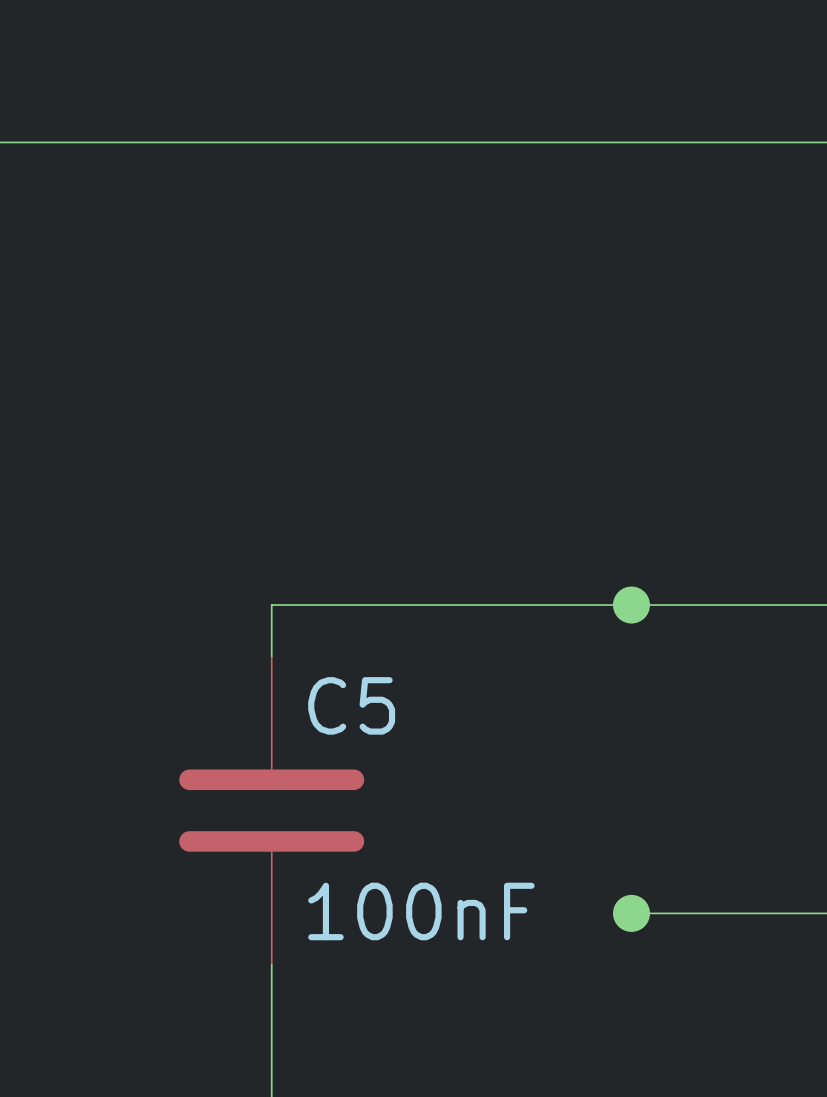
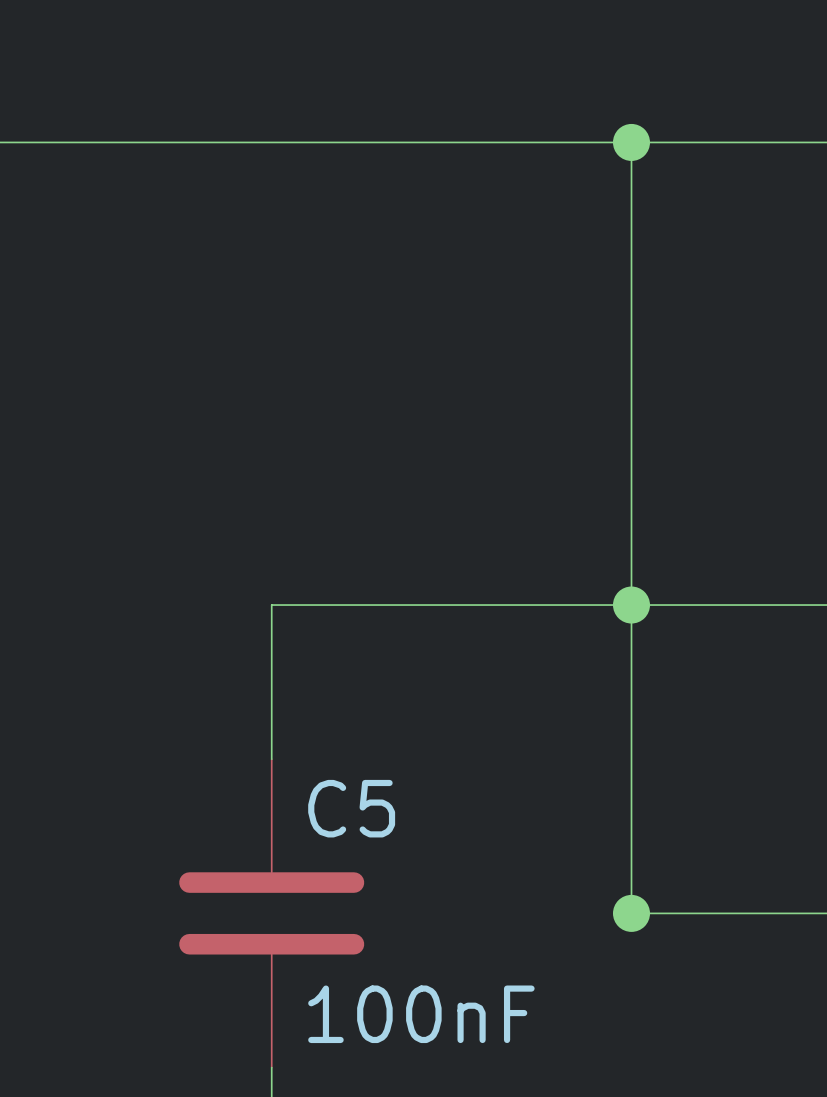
wire: none -> (631, 142) (631, 913)
junction: none -> (631, 142)
C5 position: (271, 810) -> (271, 913)

